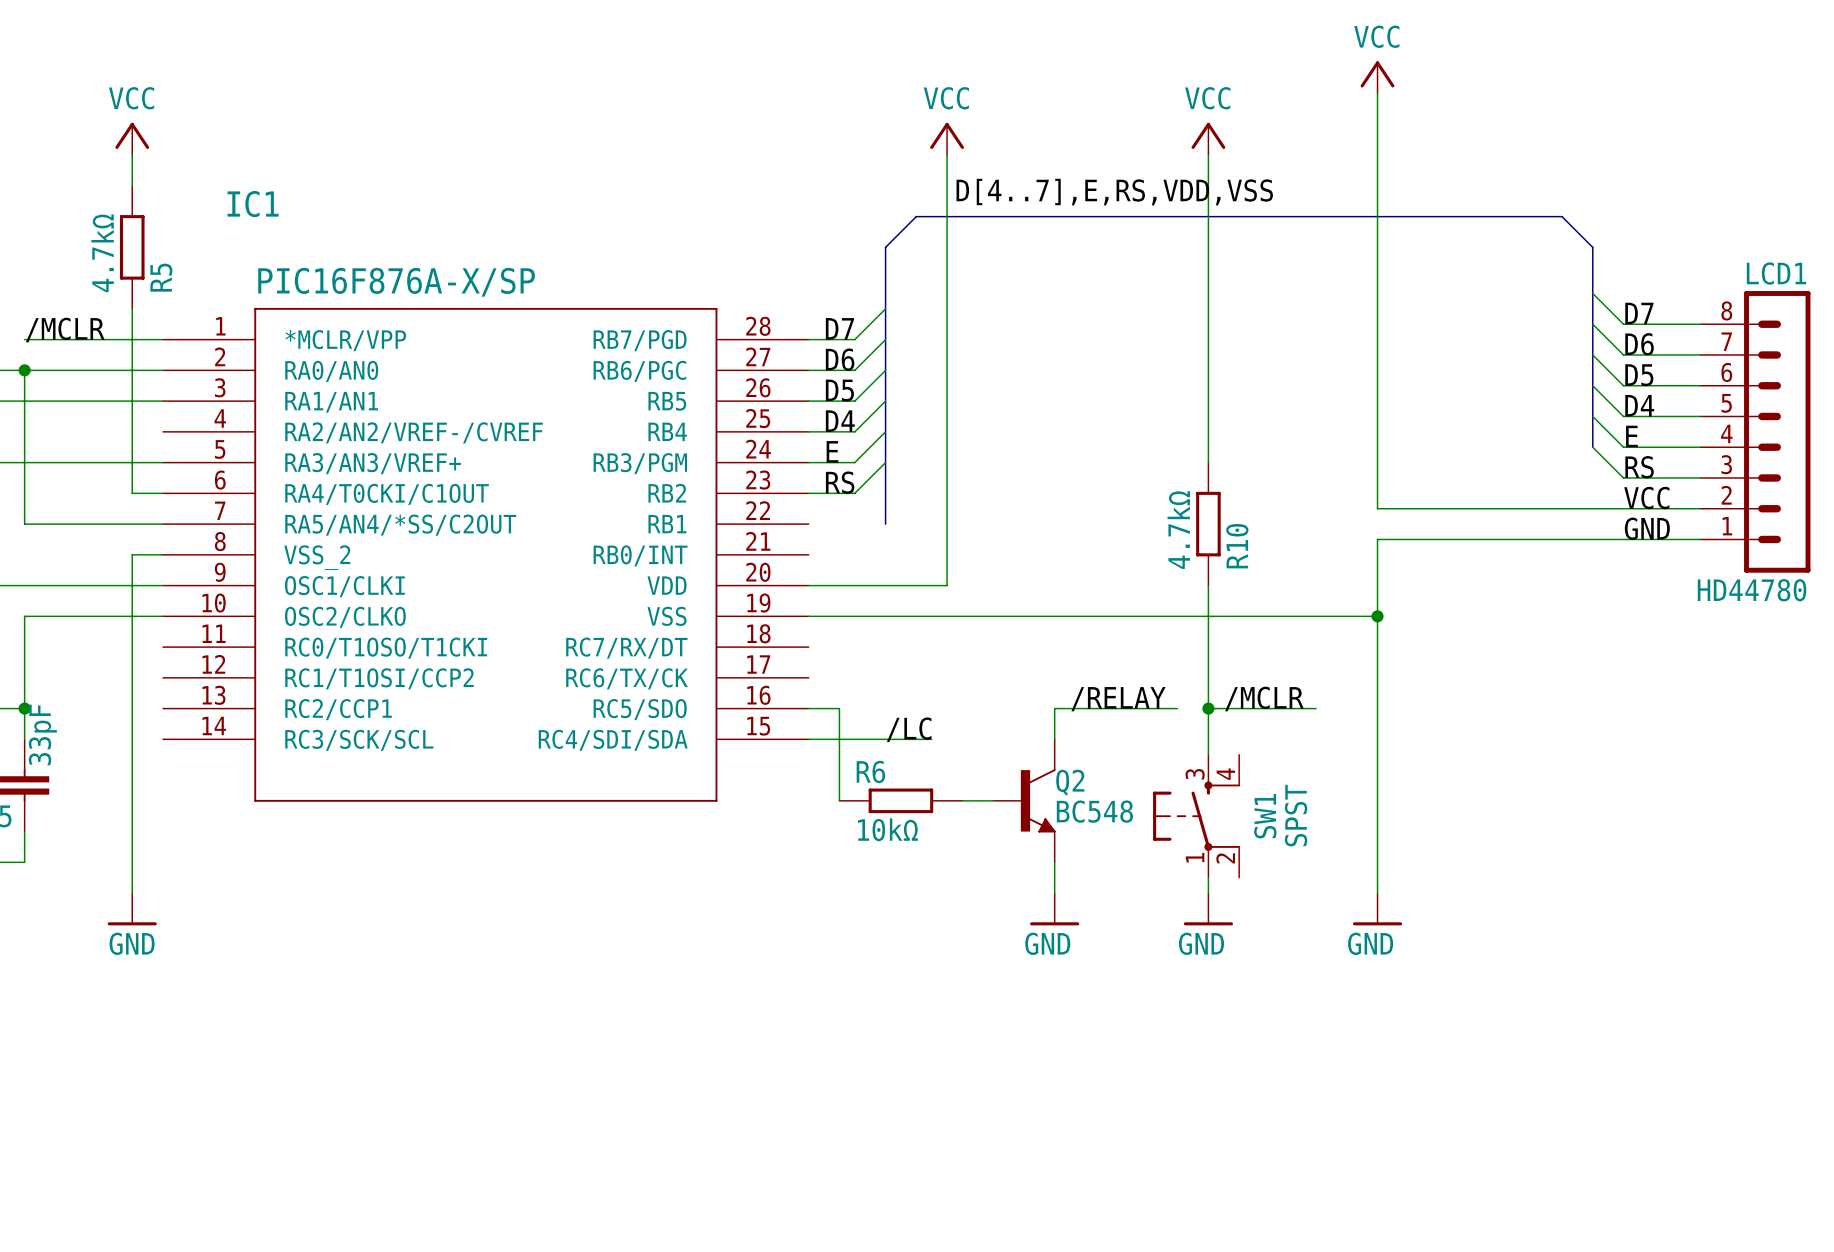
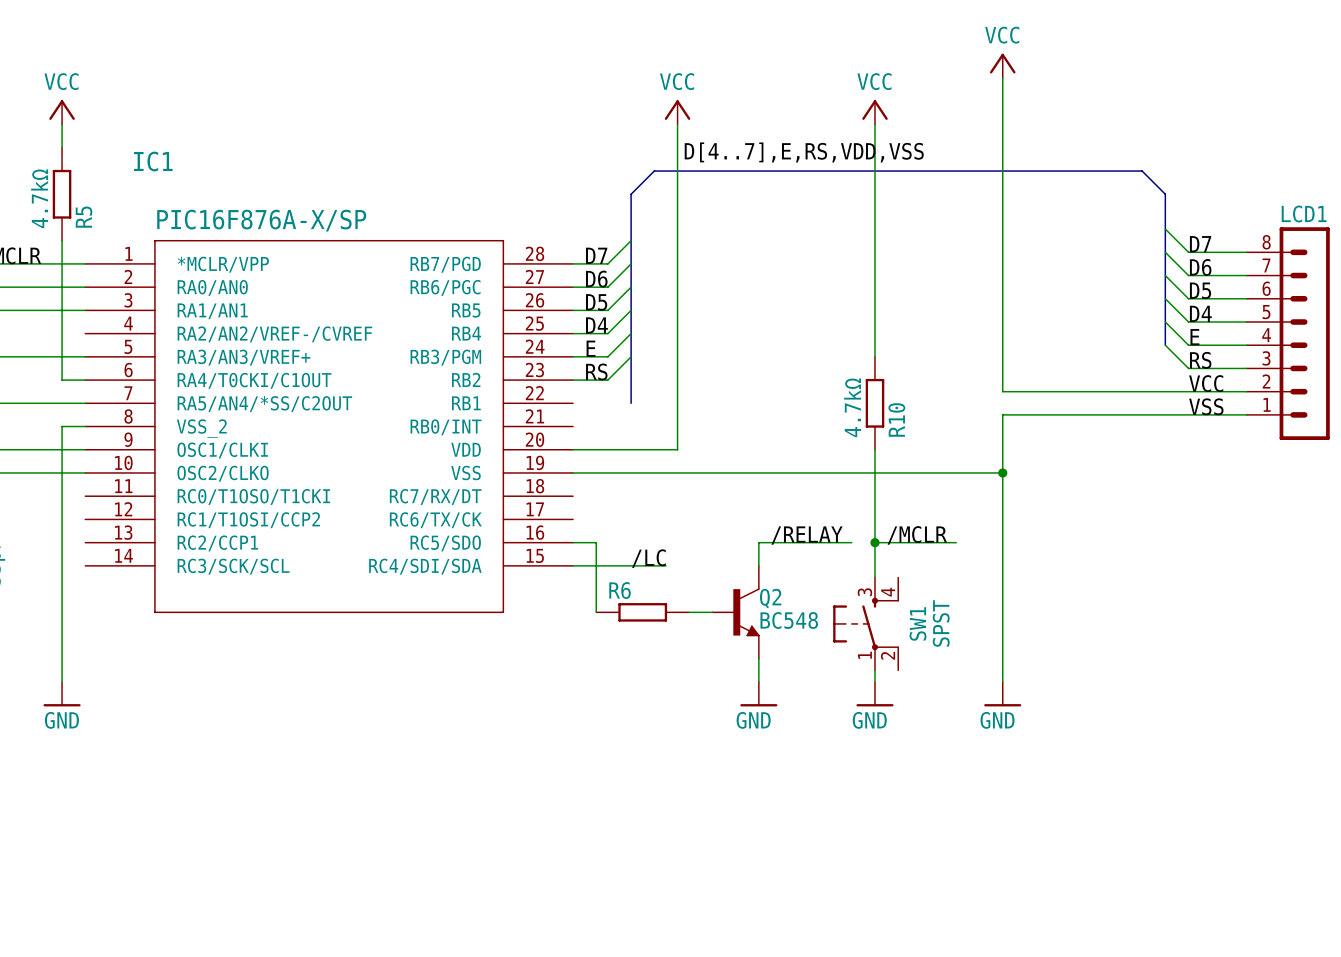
label: GND (1647, 528) -> VSS (1206, 406)
LCD1 value: HD44780 (1752, 590) -> none
R6 value: 10kΩ (887, 829) -> none

